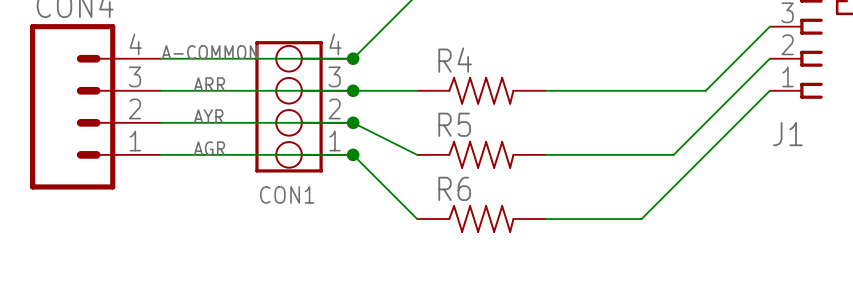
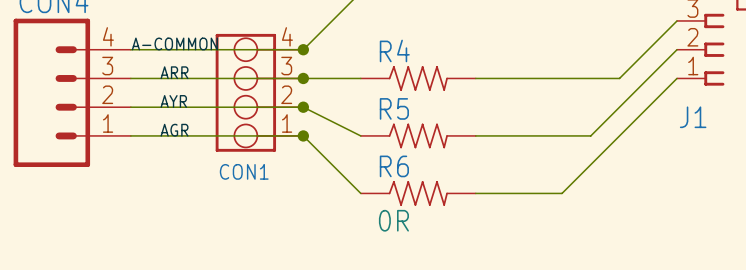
R6 value: none -> 0R (393, 220)

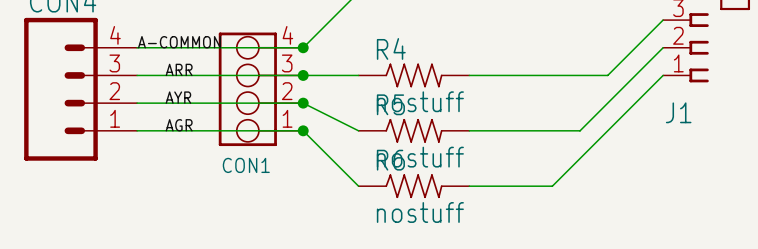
R4 value: none -> nostuff (420, 101)
R5 value: none -> nostuff (420, 157)
R6 value: 0R (393, 220) -> nostuff (420, 212)

